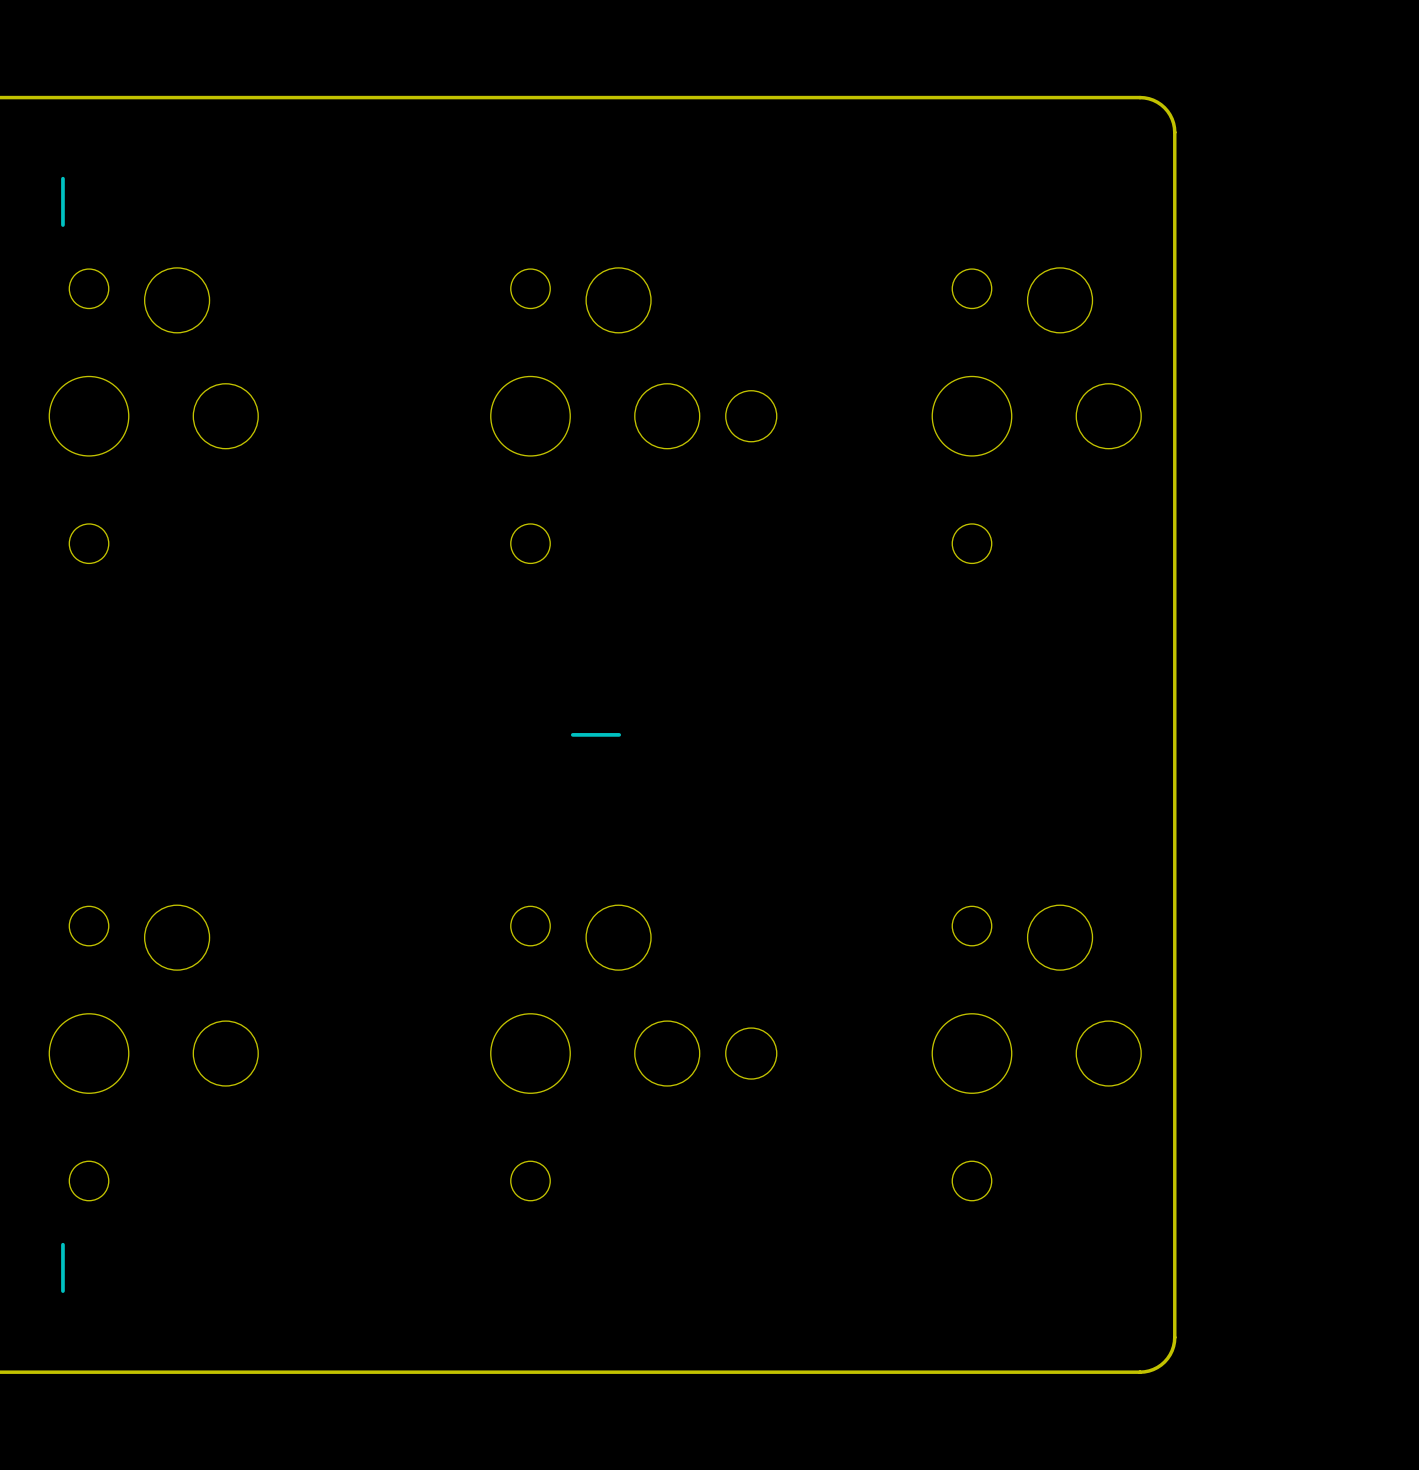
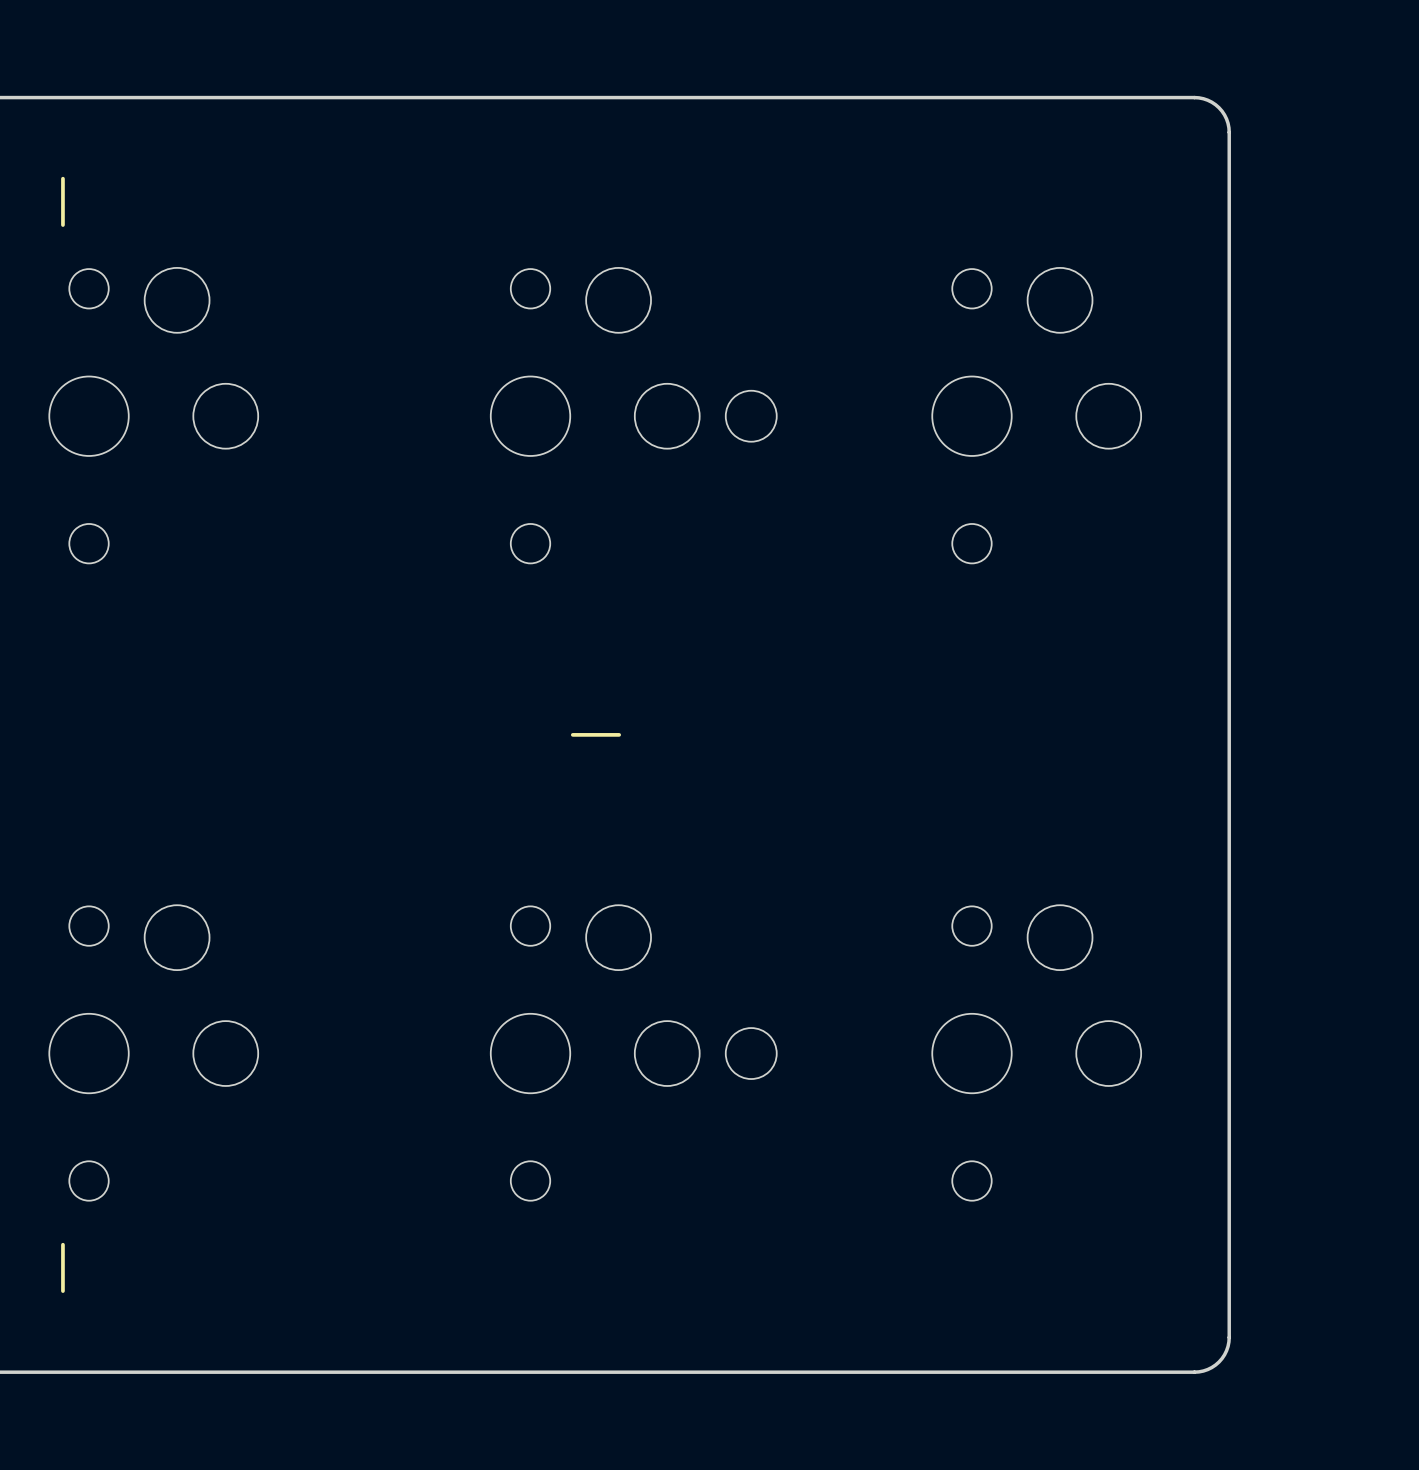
board edge: (1140, 97) (1153, 100) (1164, 107) (1172, 119) (1174, 132) (1174, 1337) (1172, 1350) (1164, 1362) (1153, 1369) (1140, 1372) -> (1140, 97) (1194, 97) (1207, 100) (1222, 111) (1228, 123) (1229, 132) (1228, 1341) (1222, 1358) (1207, 1369) (1194, 1372) (1140, 1372)

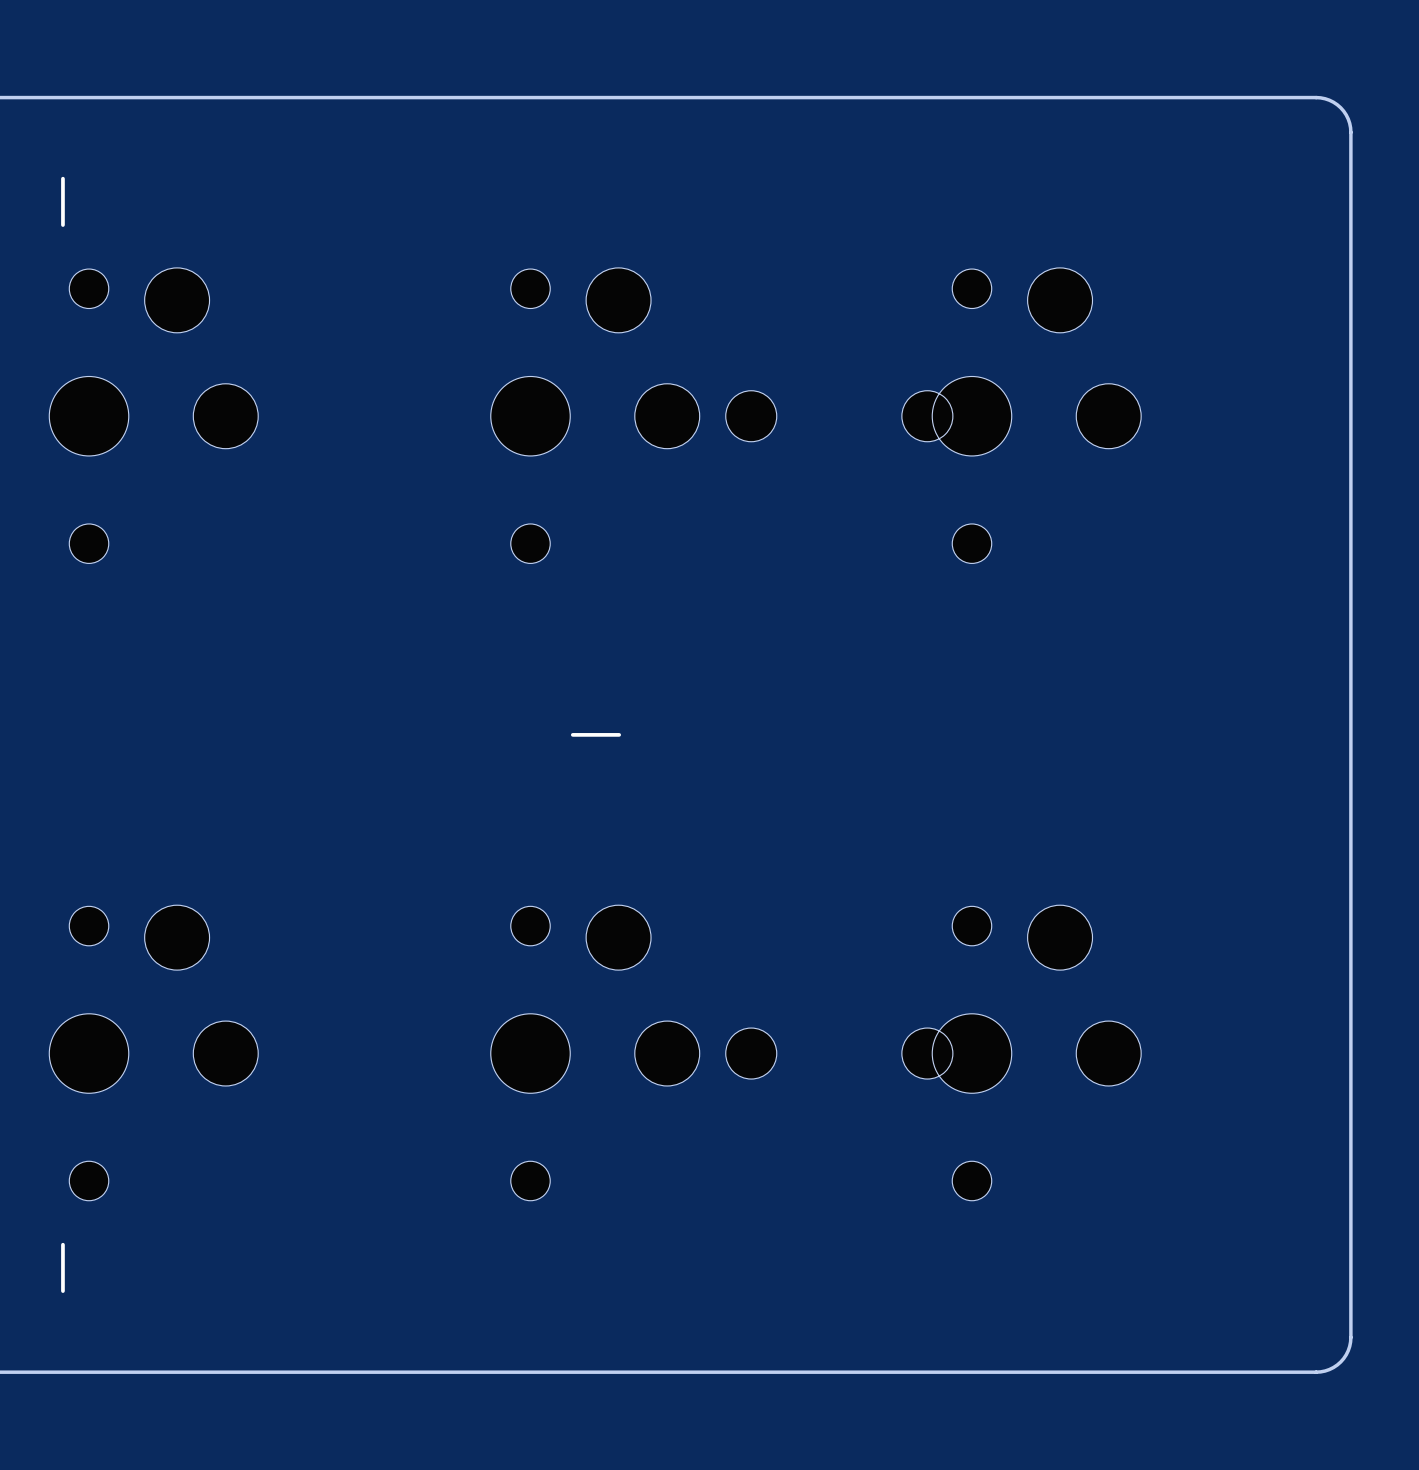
board edge: (1194, 97) (1207, 100) (1219, 107) (1226, 119) (1229, 132) (1229, 1337) (1226, 1350) (1219, 1362) (1207, 1369) (1194, 1372) -> (1194, 97) (1325, 98) (1333, 102) (1343, 111) (1348, 119) (1350, 132) (1350, 1341) (1348, 1350) (1340, 1362) (1329, 1369) (1320, 1371) (1194, 1372)
part: none -> (927, 416)
part: none -> (927, 1053)

